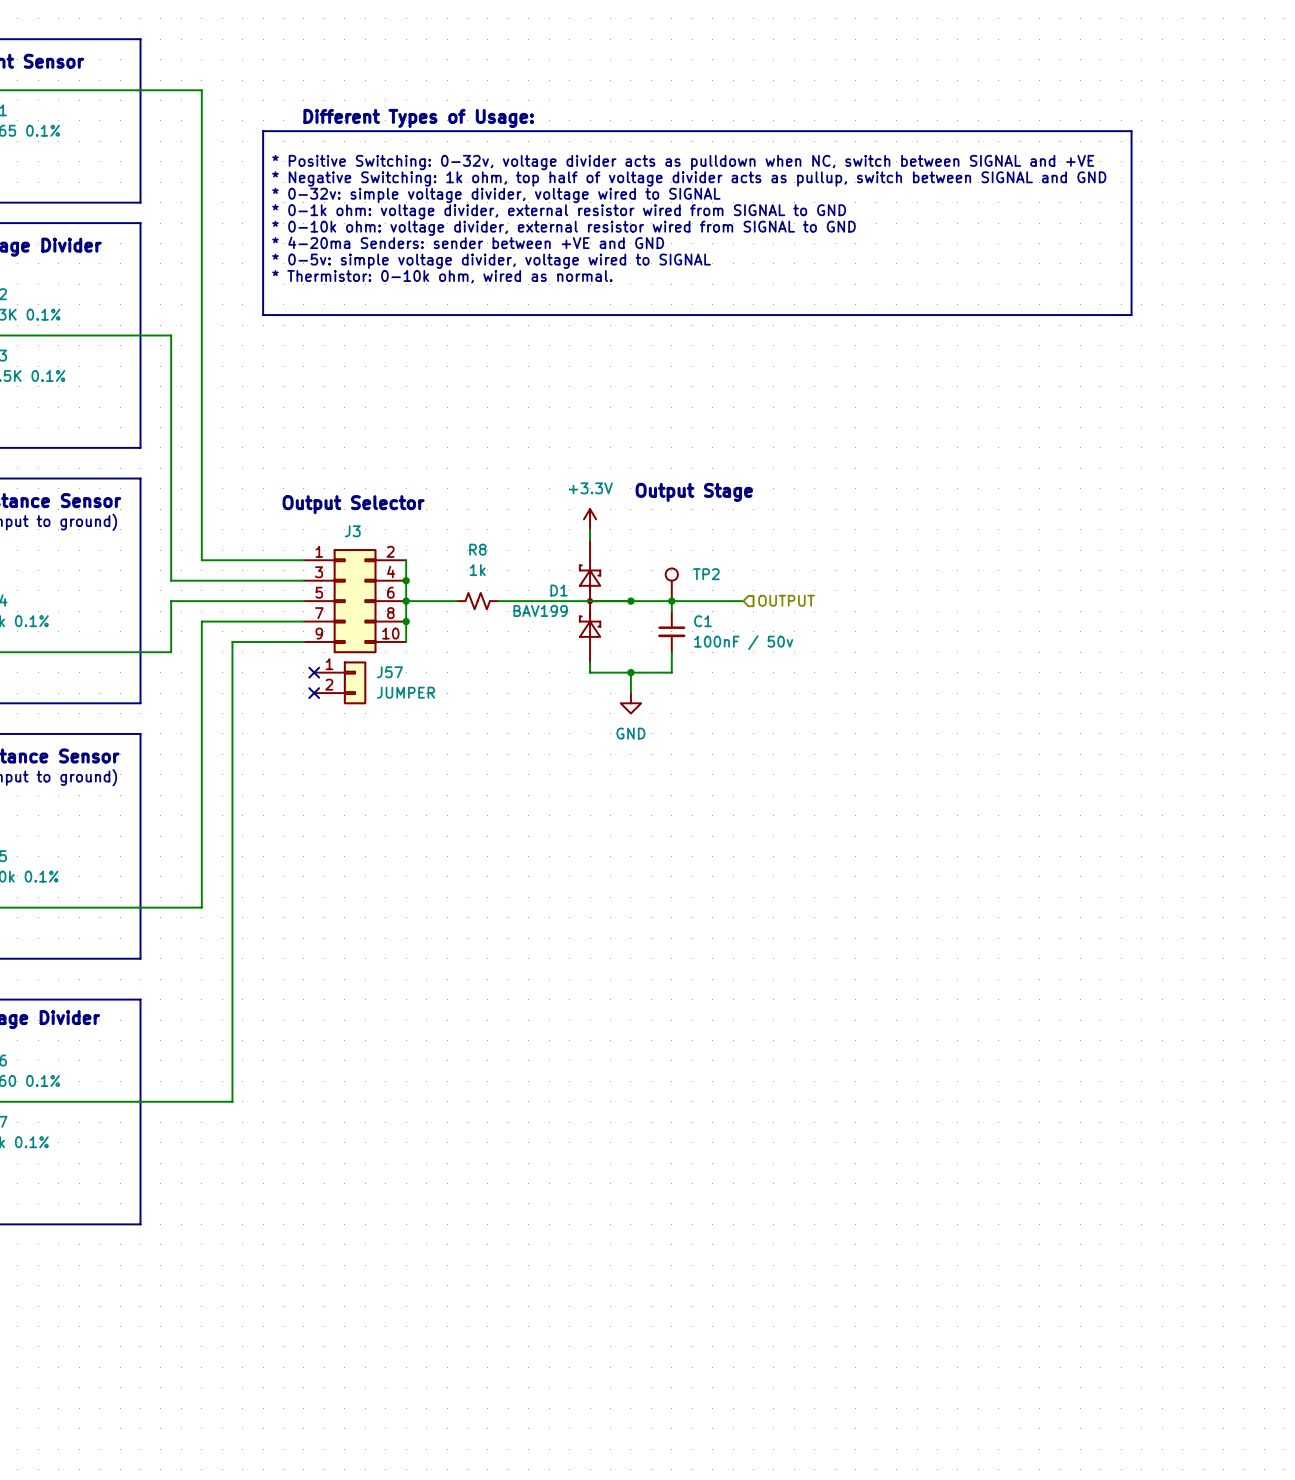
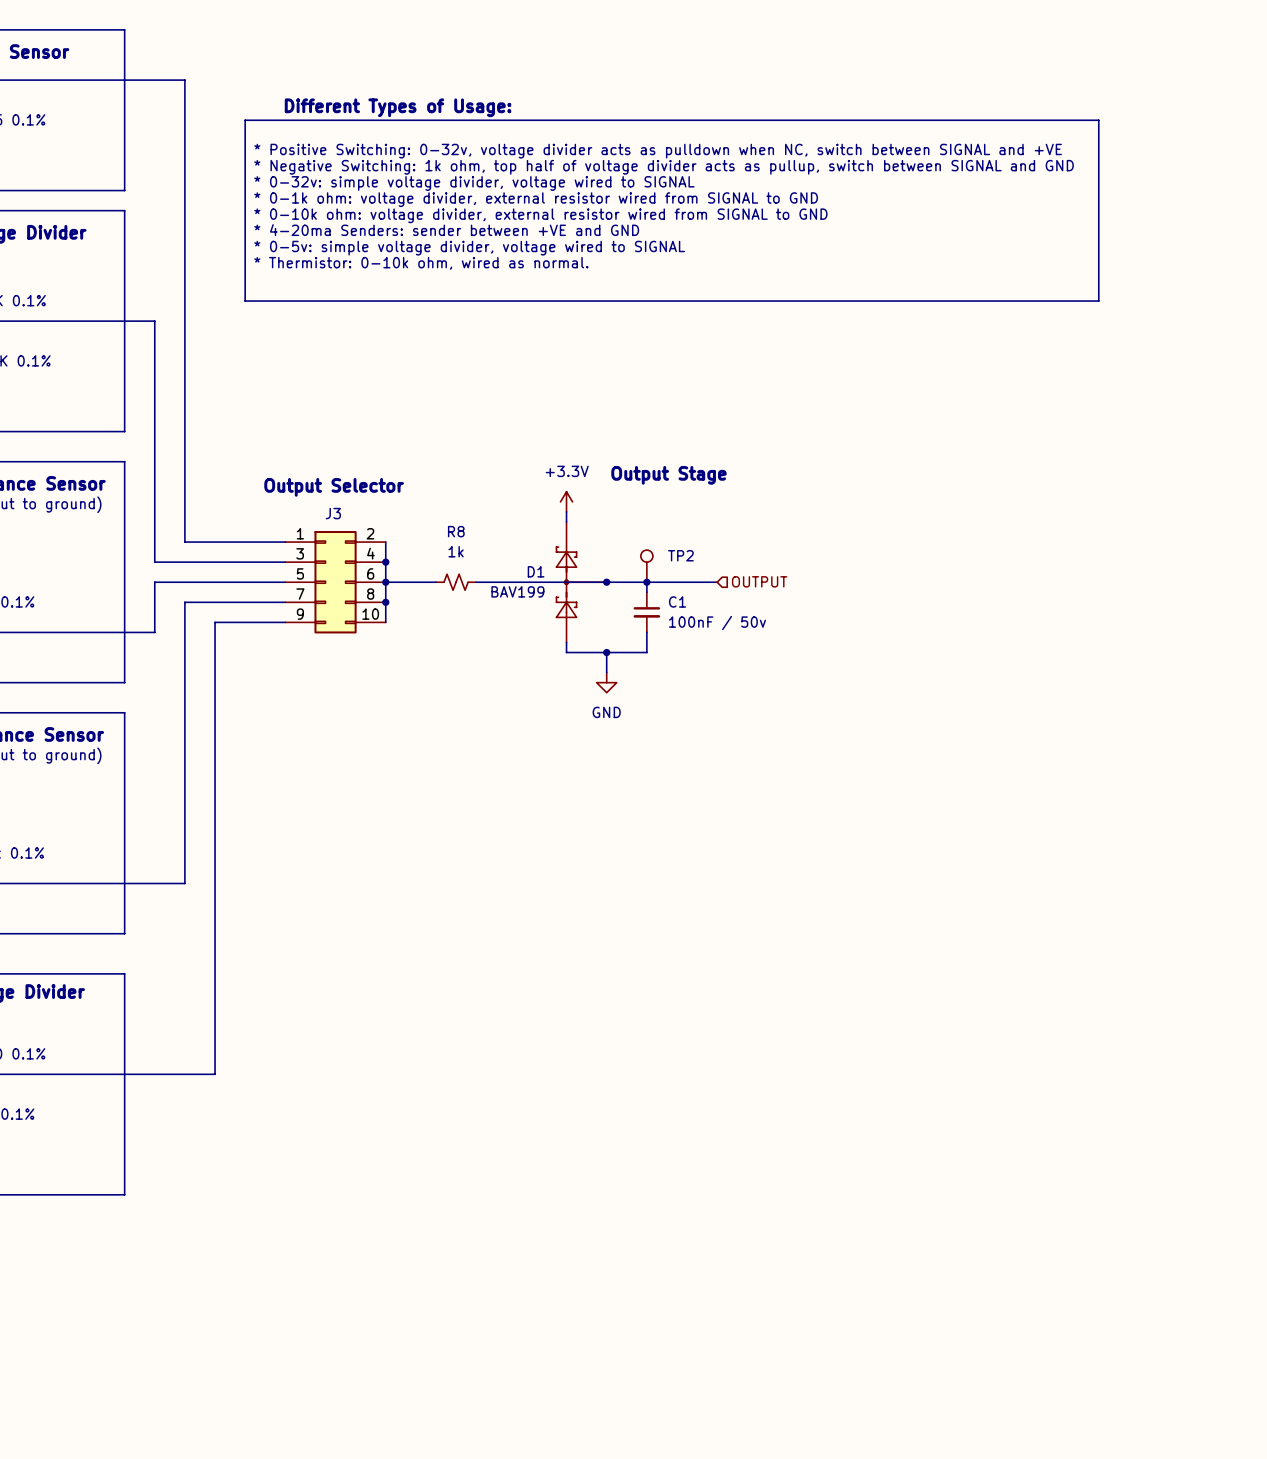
no-connect mark: (314, 672) -> none
J57: JUMPER (340, 682) -> none
no-connect mark: (314, 693) -> none

